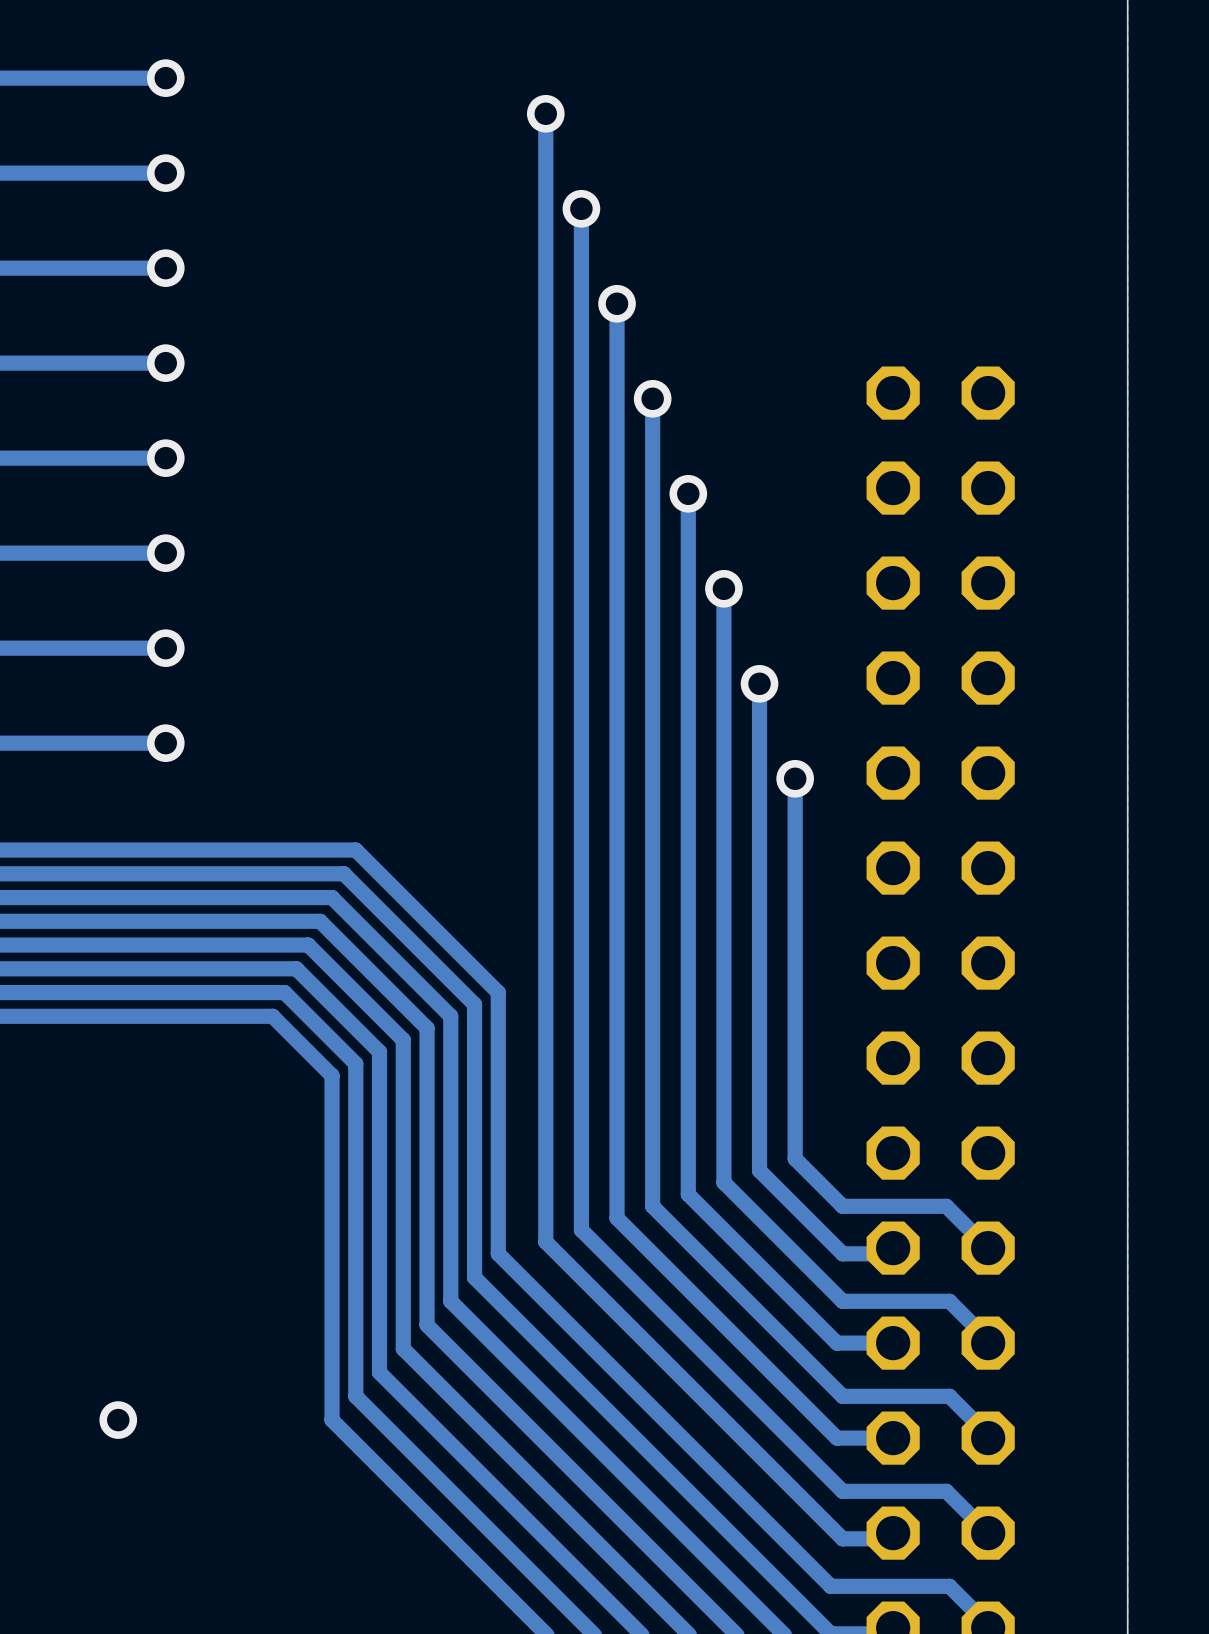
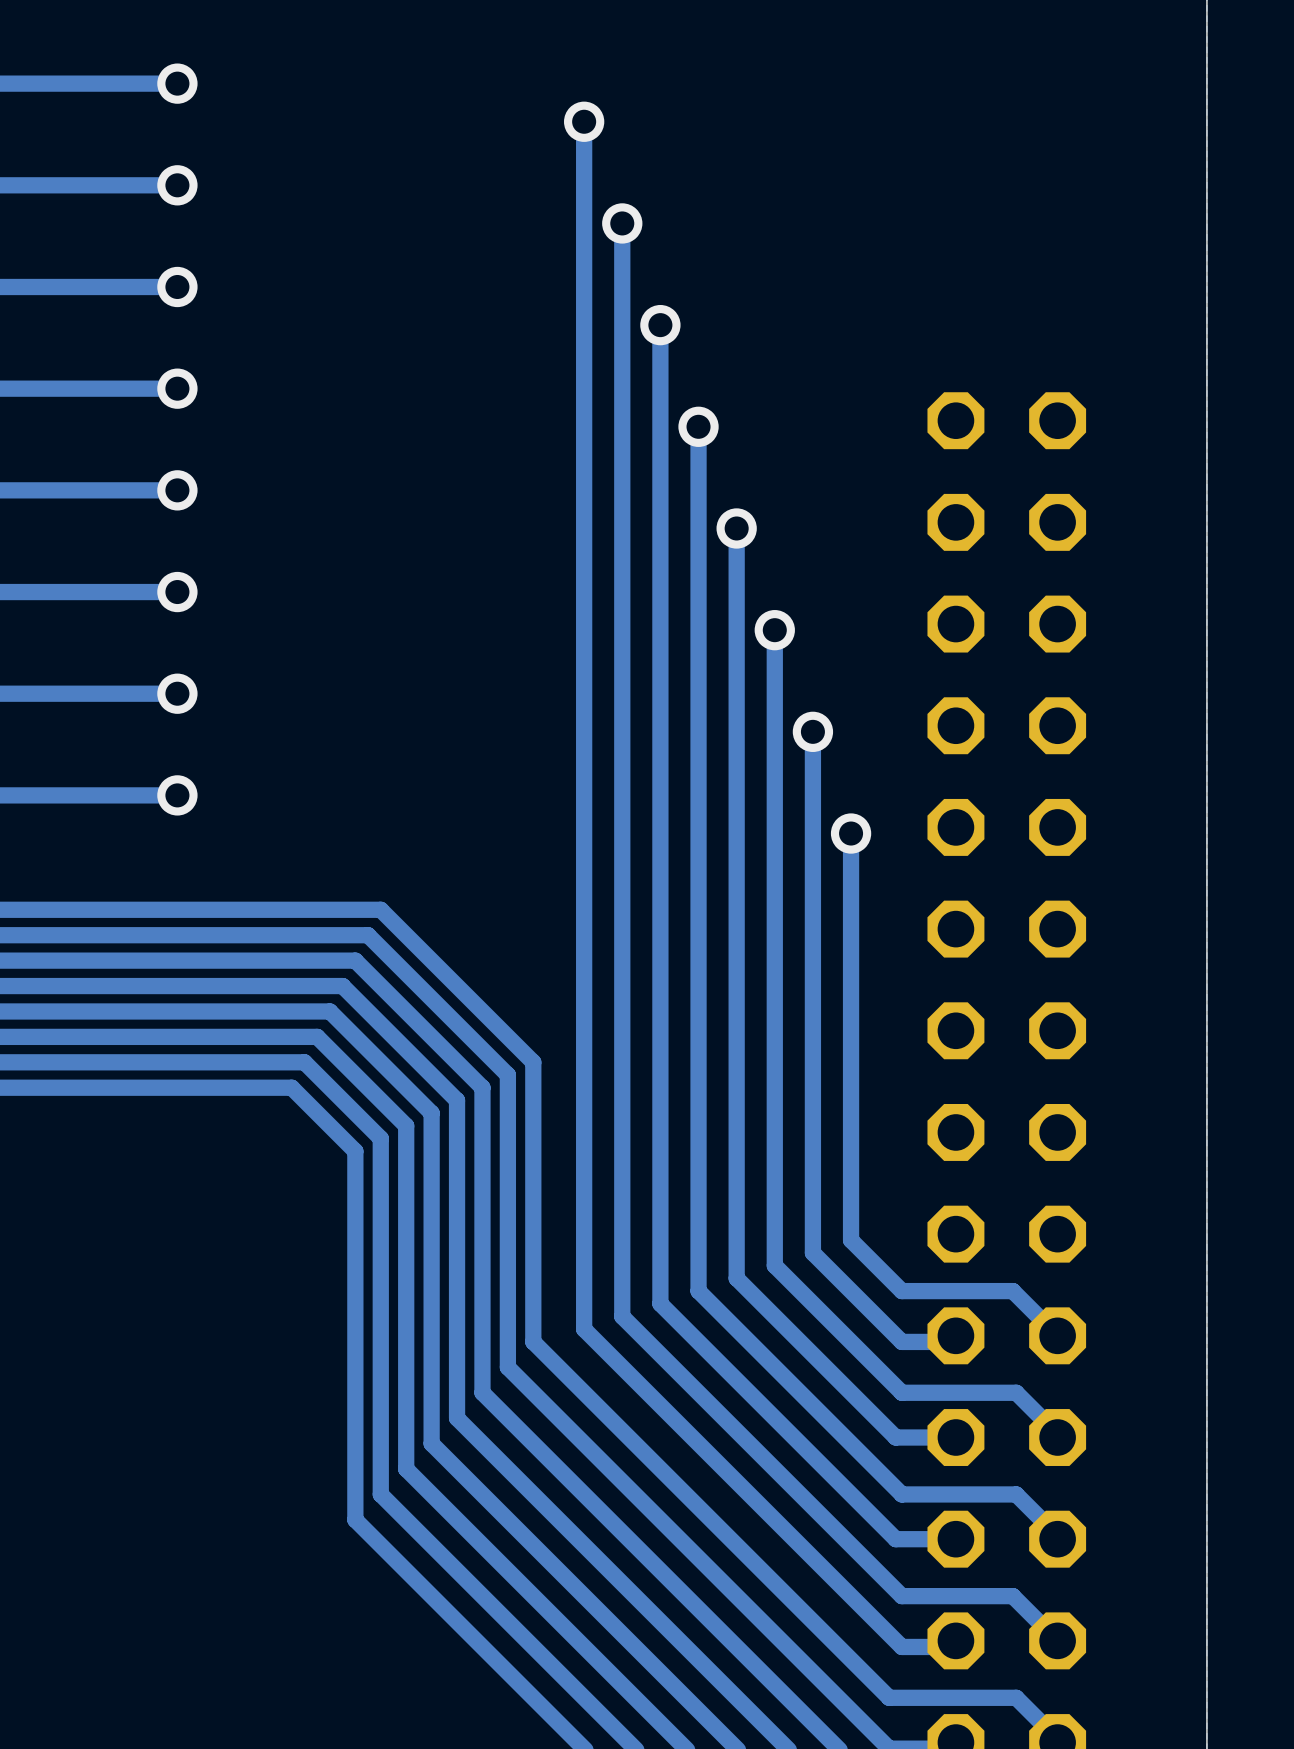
via: (118, 1420) -> none

